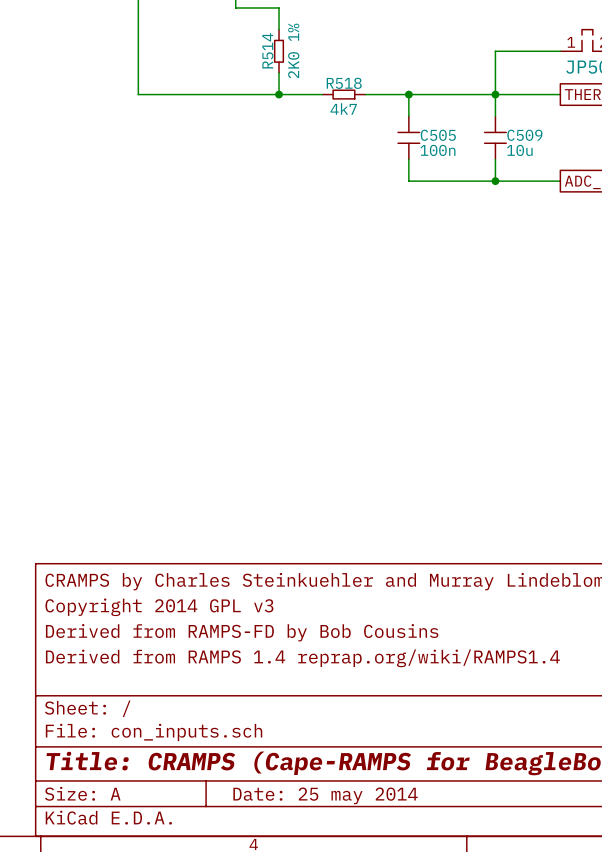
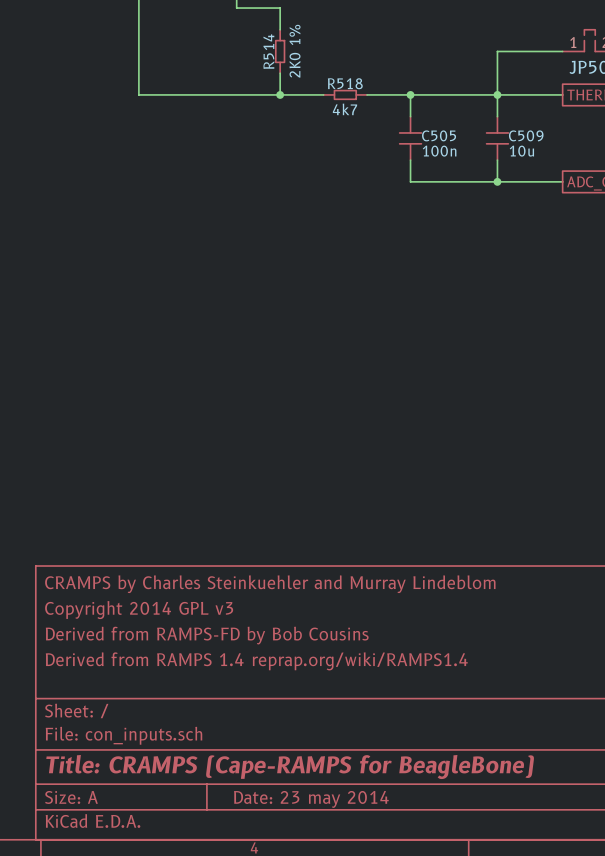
title block: Date: 25 may 2014 (325, 795) -> Date: 23 may 2014 (311, 799)

